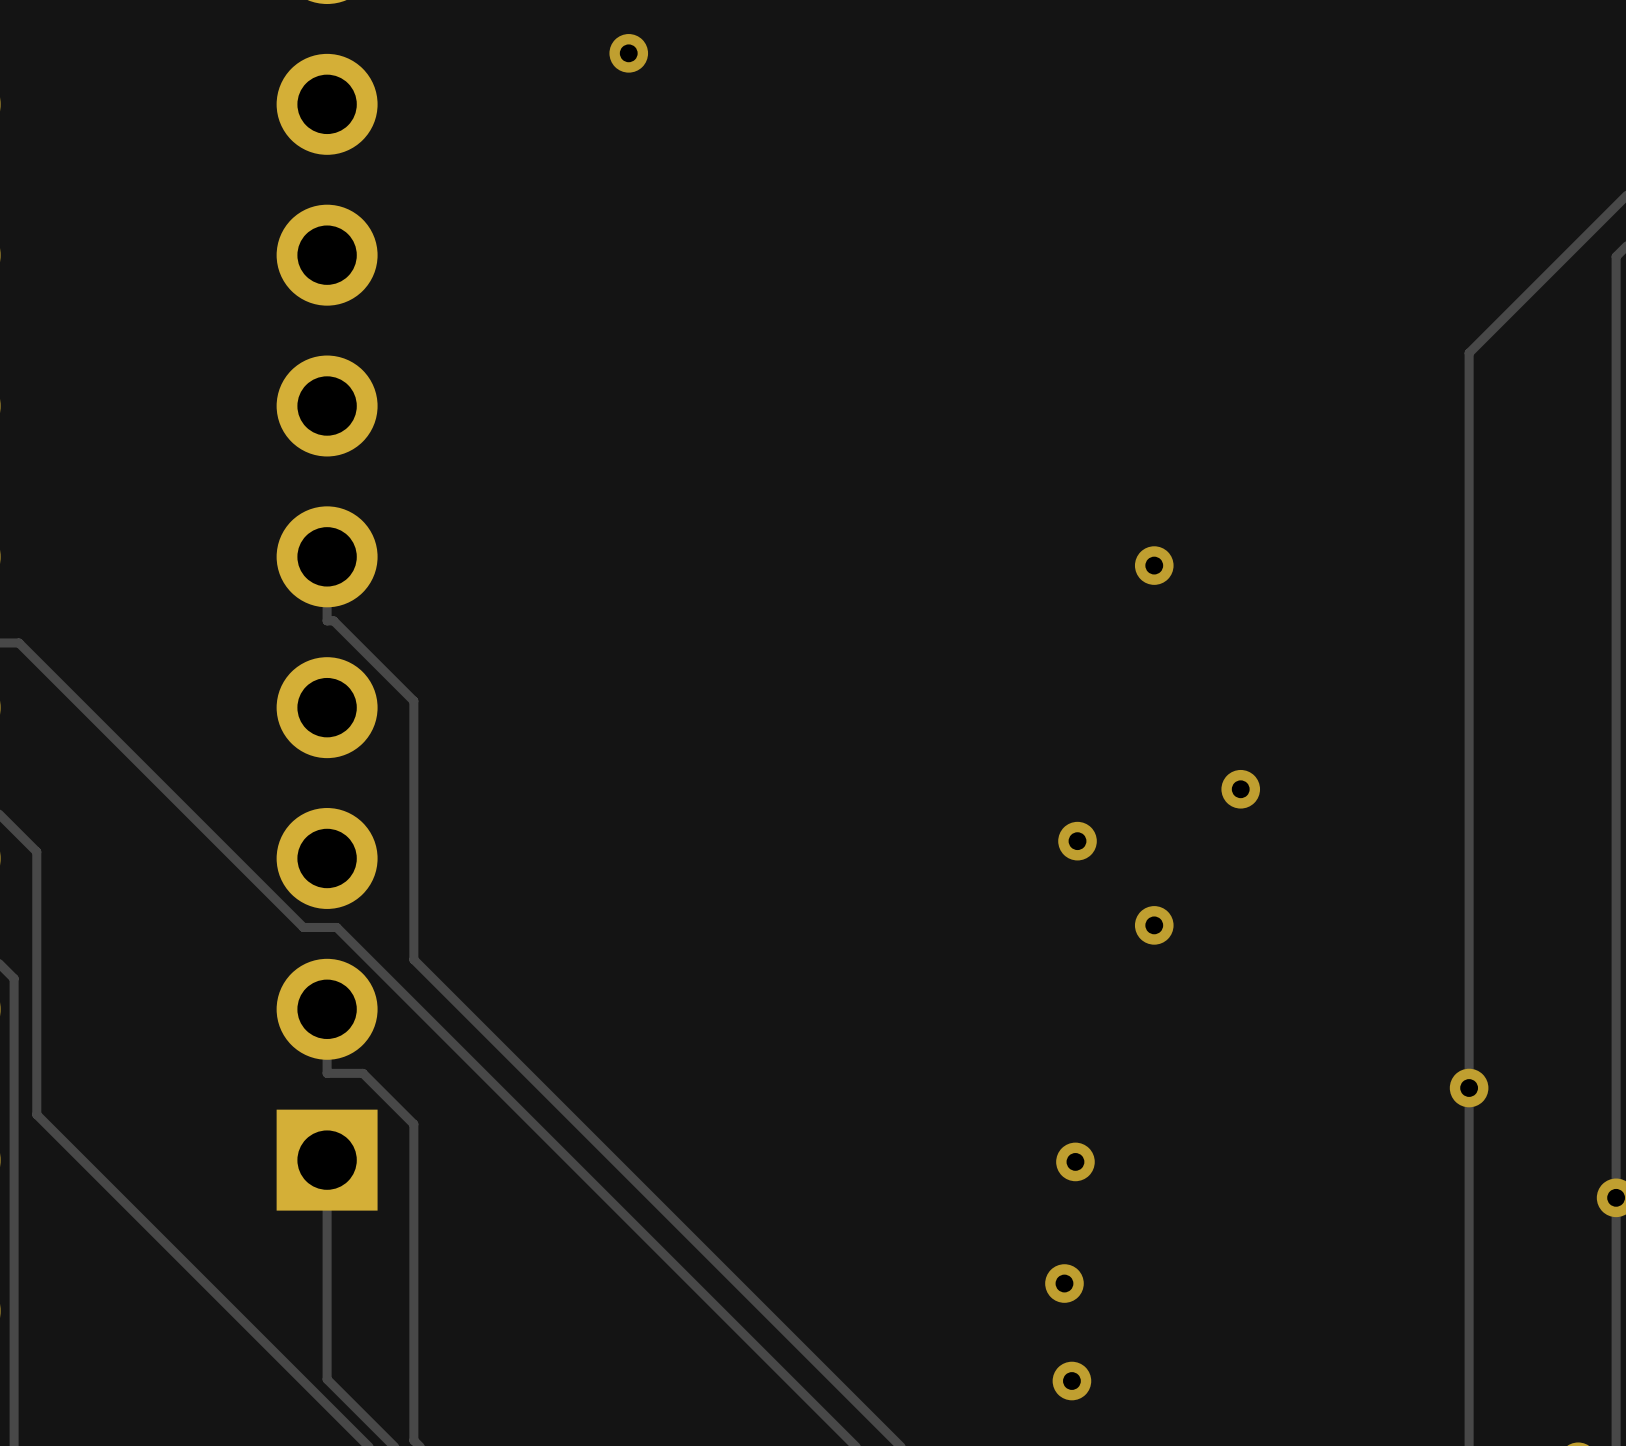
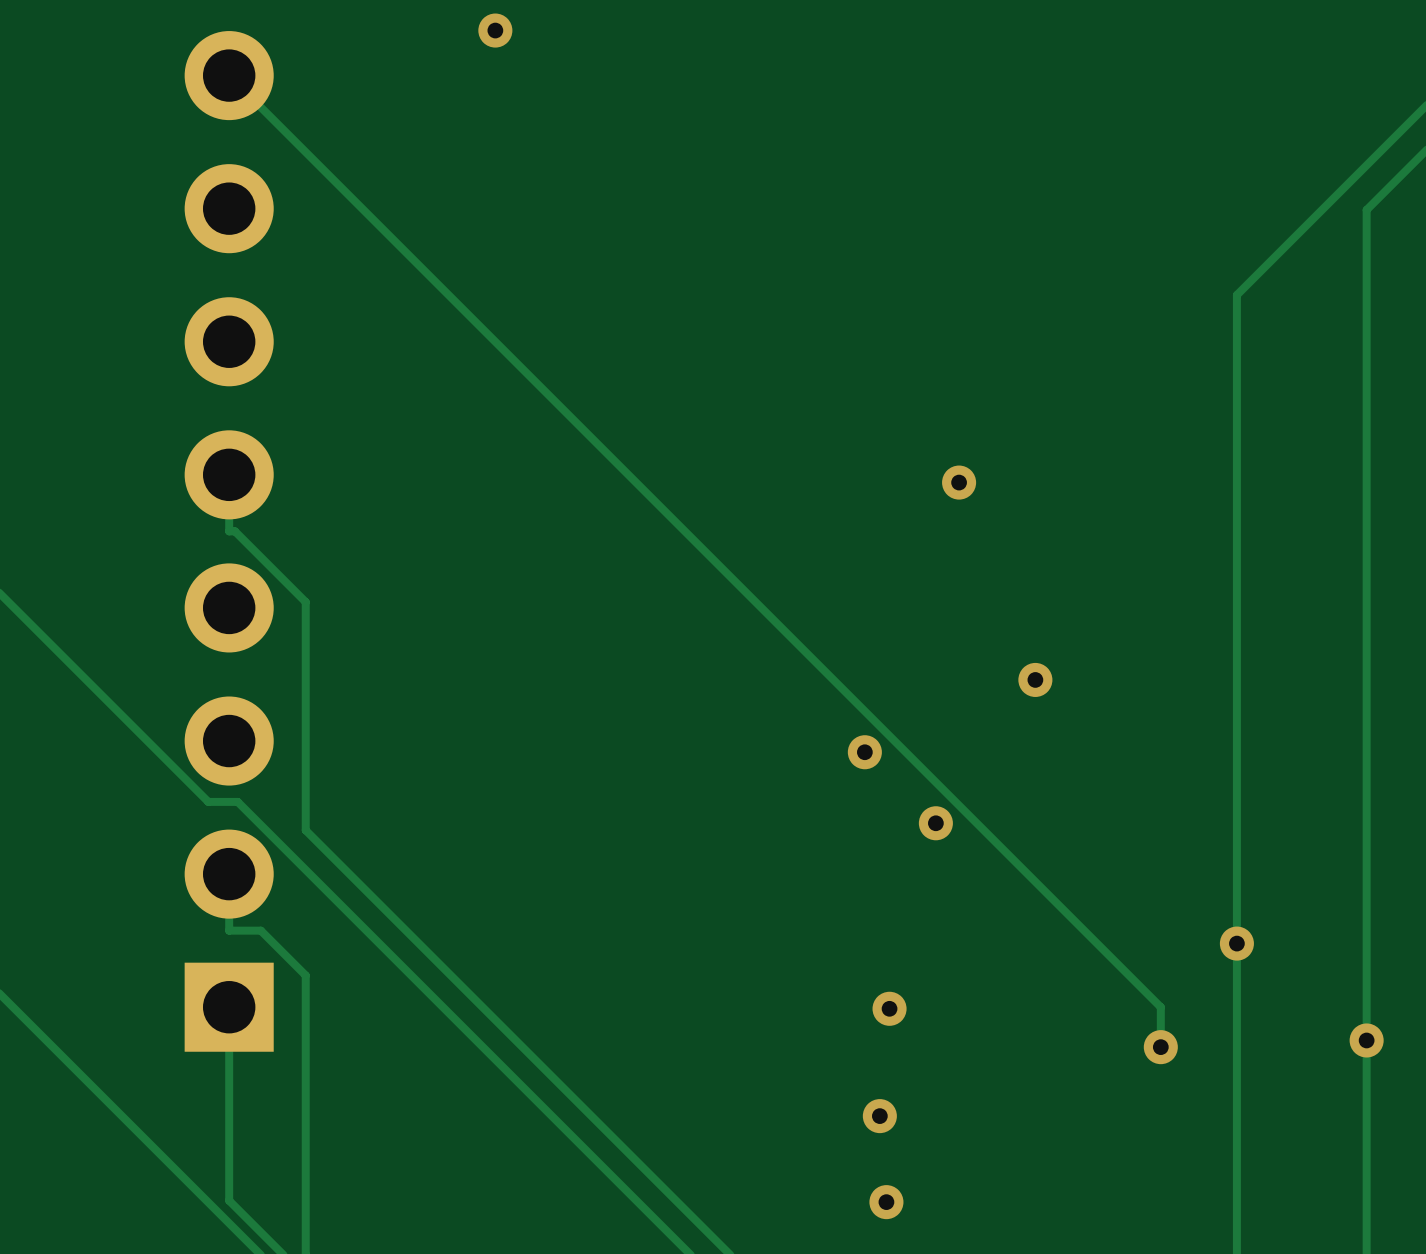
track: none -> (229, 75) (1160, 1007) (1160, 1047)
via position: (1077, 841) -> (864, 752)
via position: (1154, 925) -> (935, 823)
via: none -> (1160, 1047)

